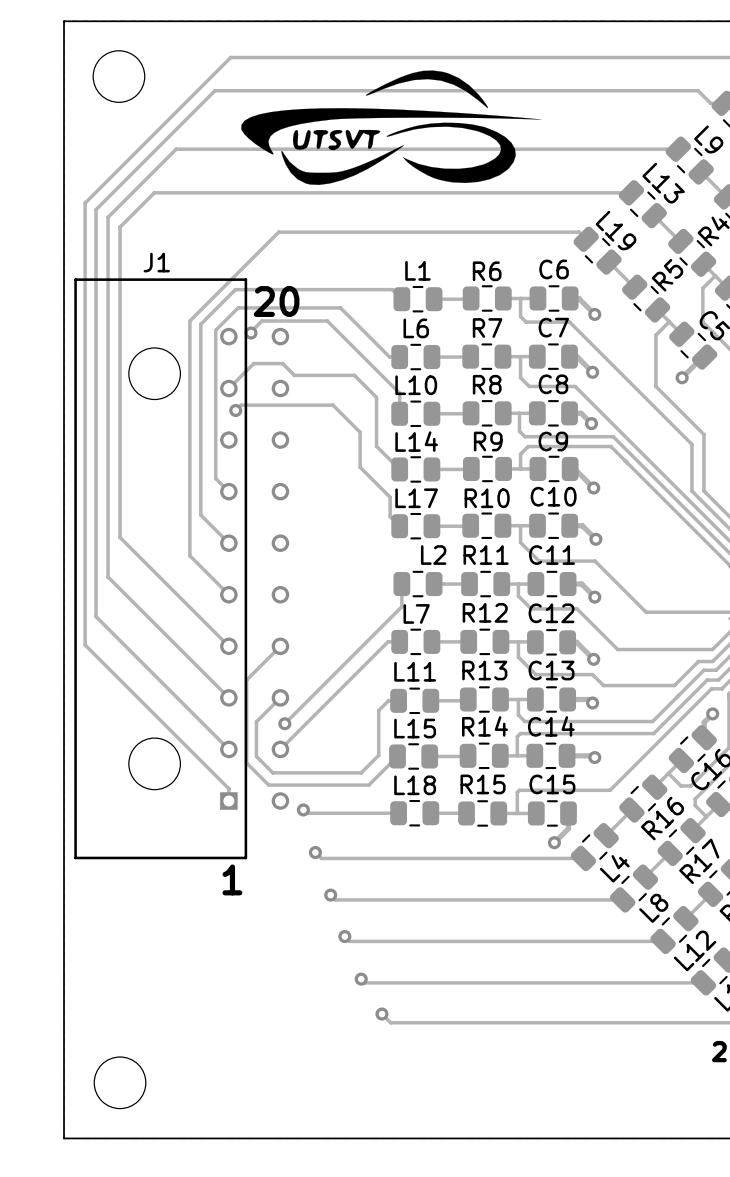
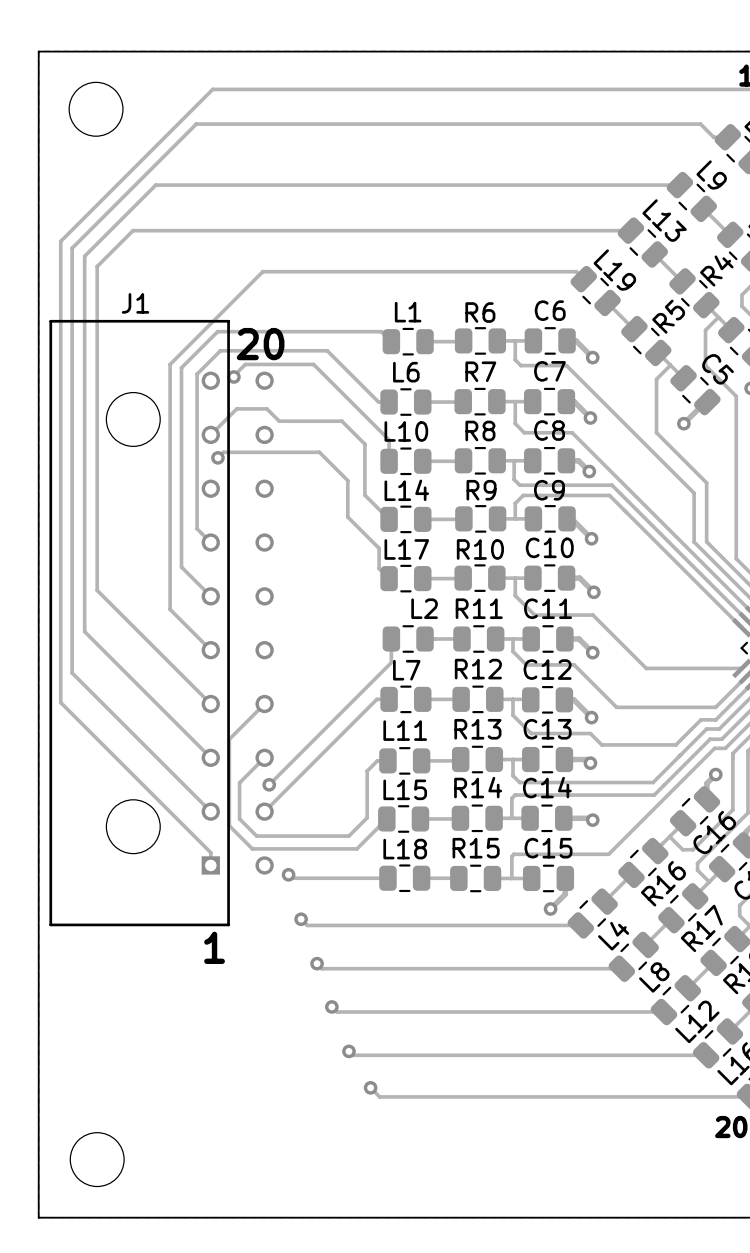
drawing: [241, 70, 542, 185] -> none

